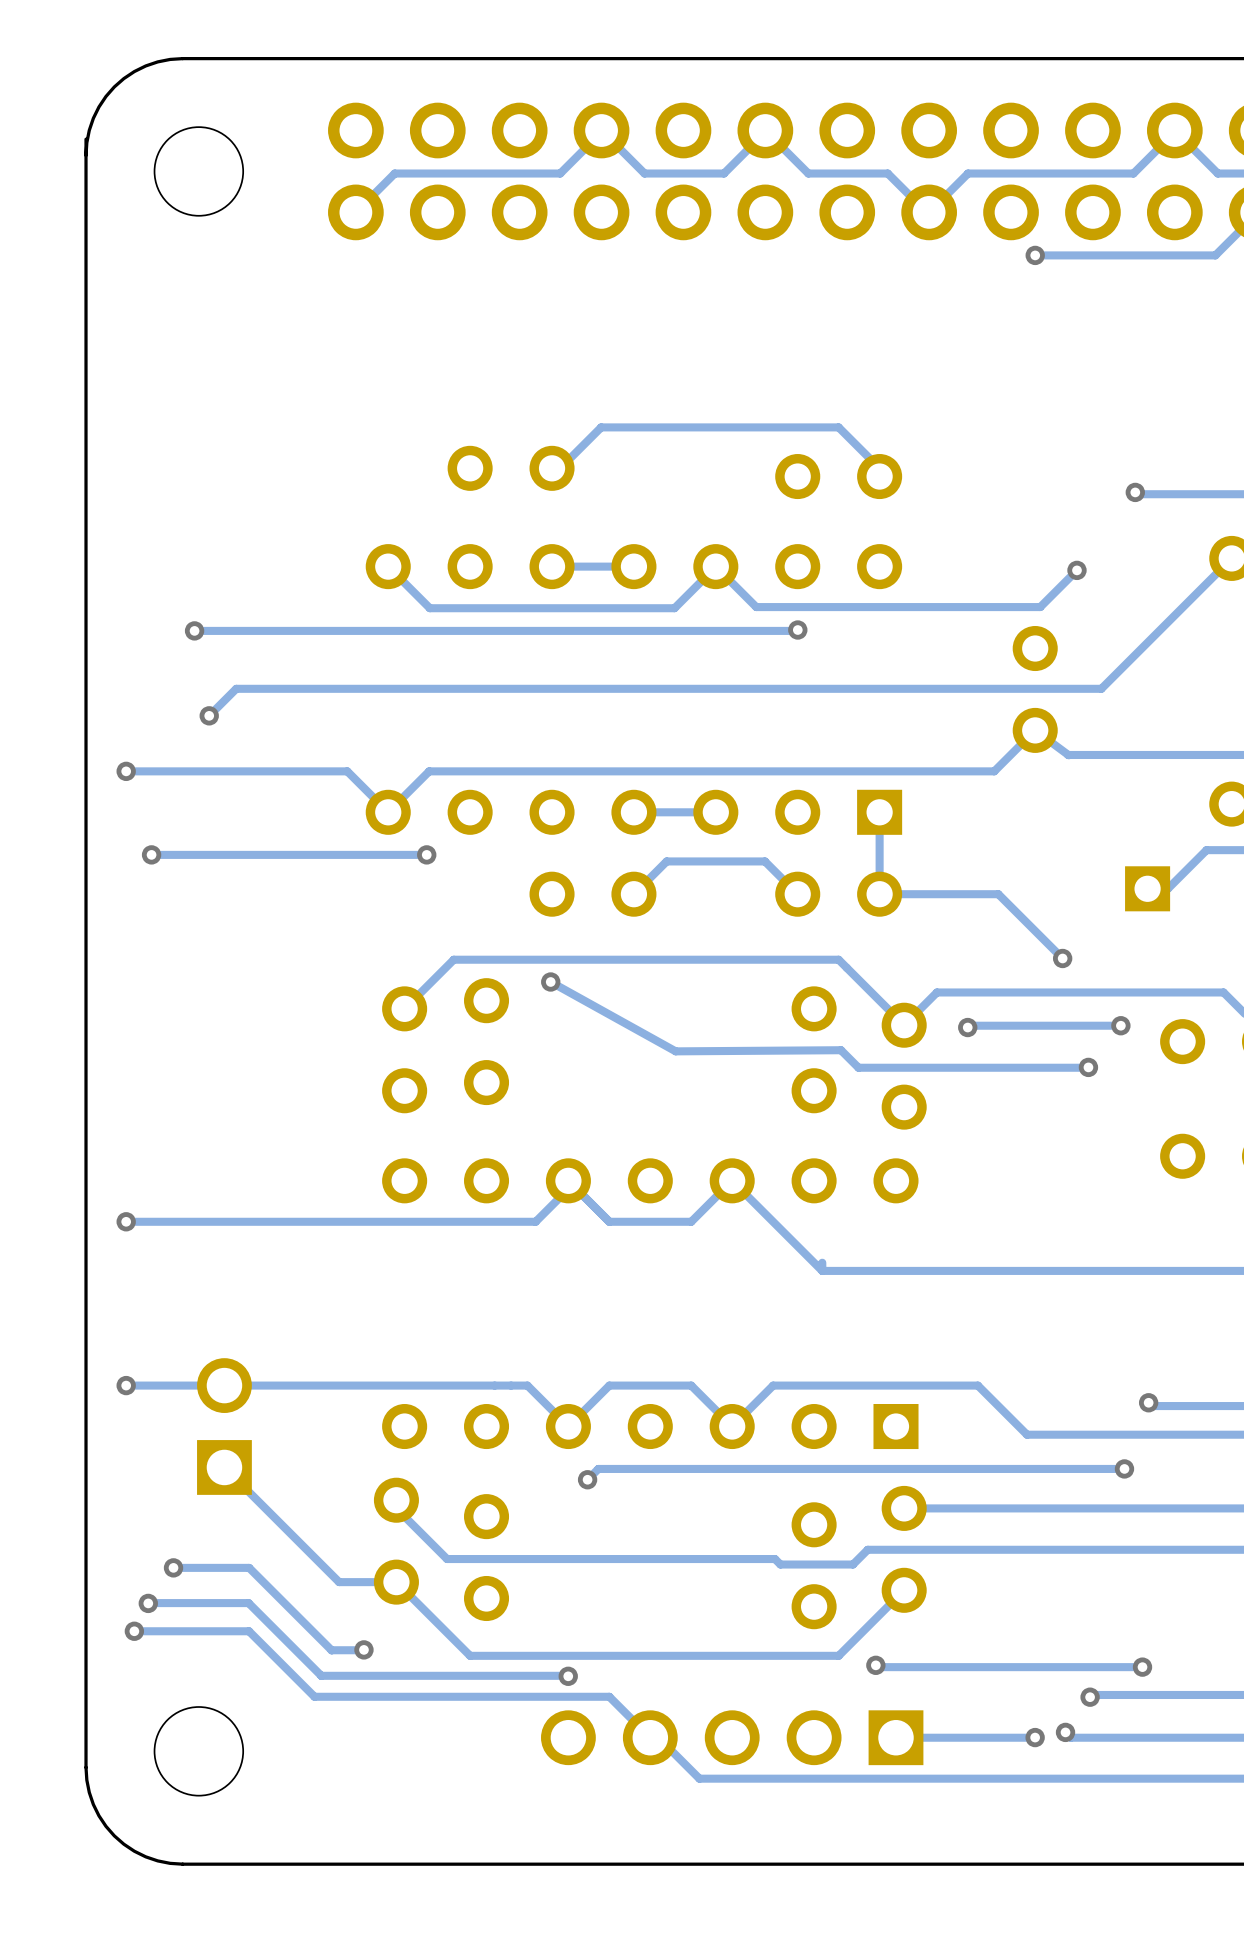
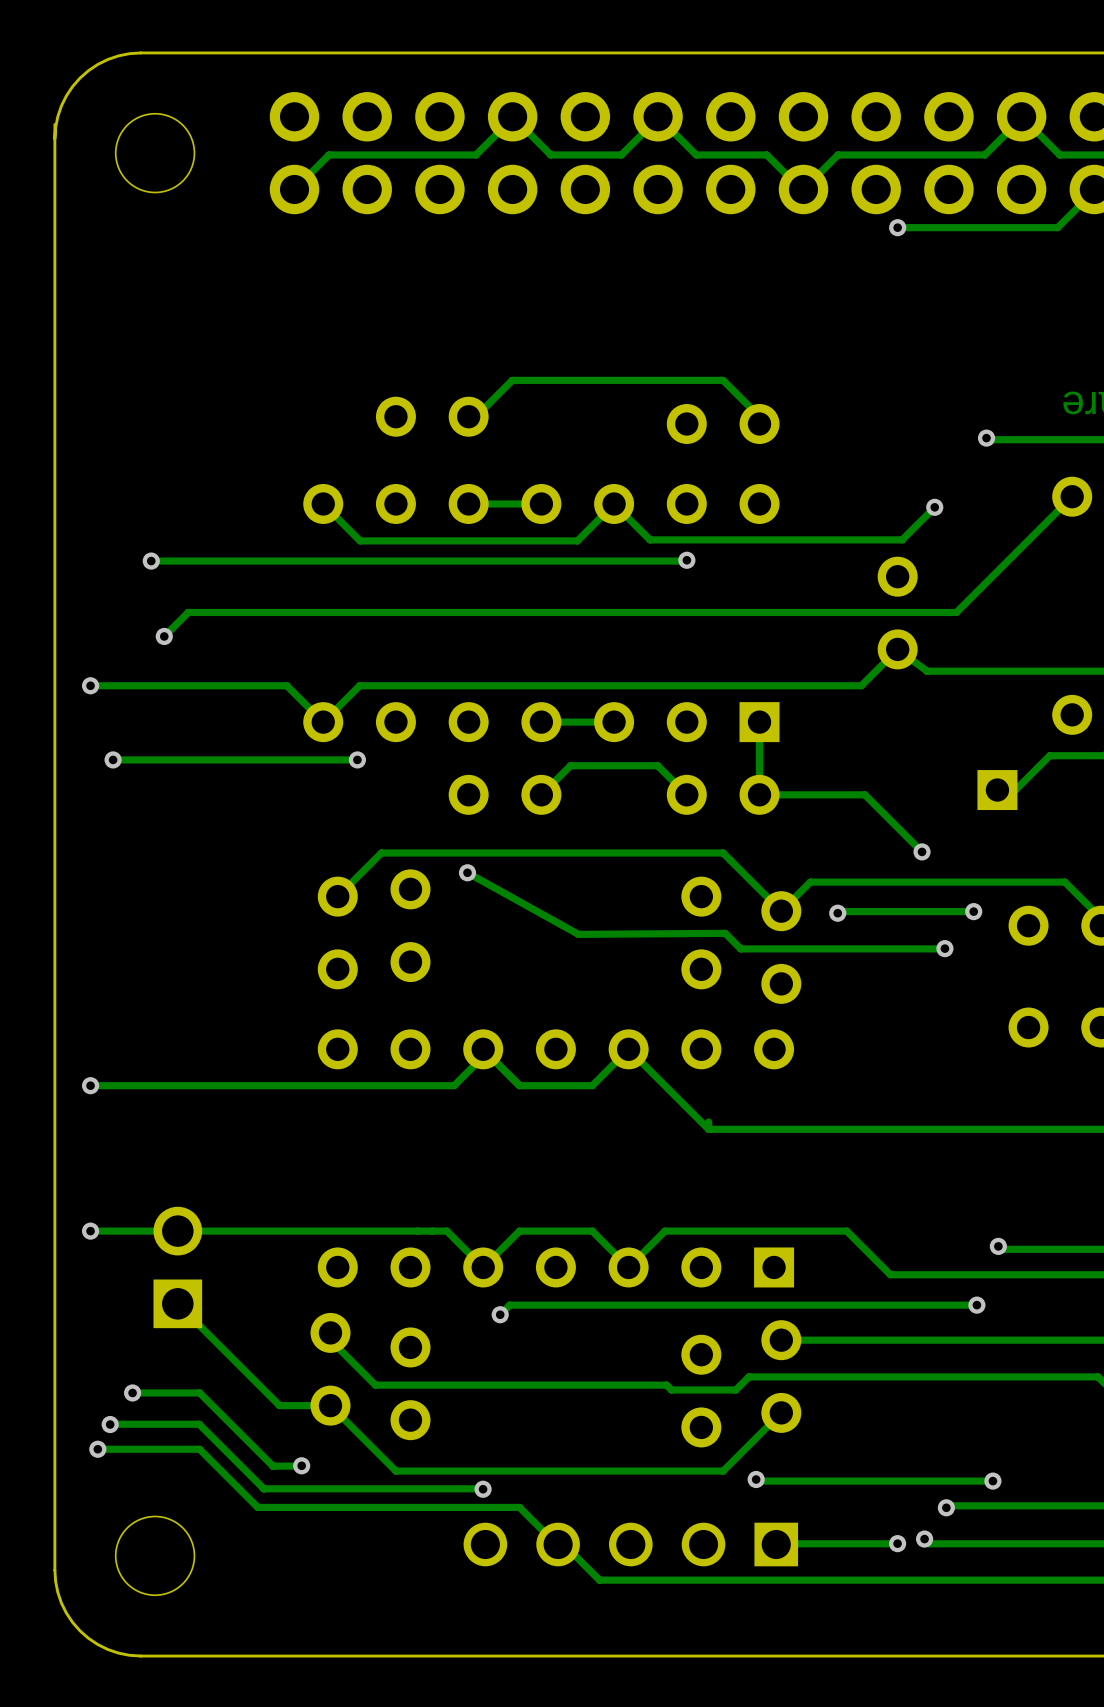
part footprint: [541, 1710, 924, 1766] -> [463, 1522, 799, 1567]

